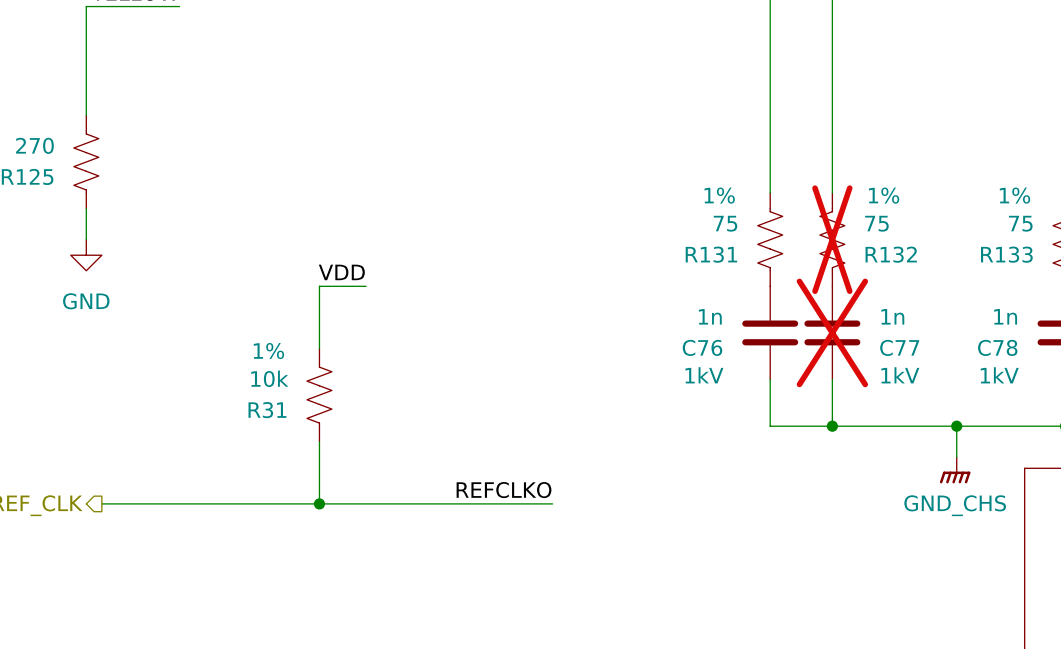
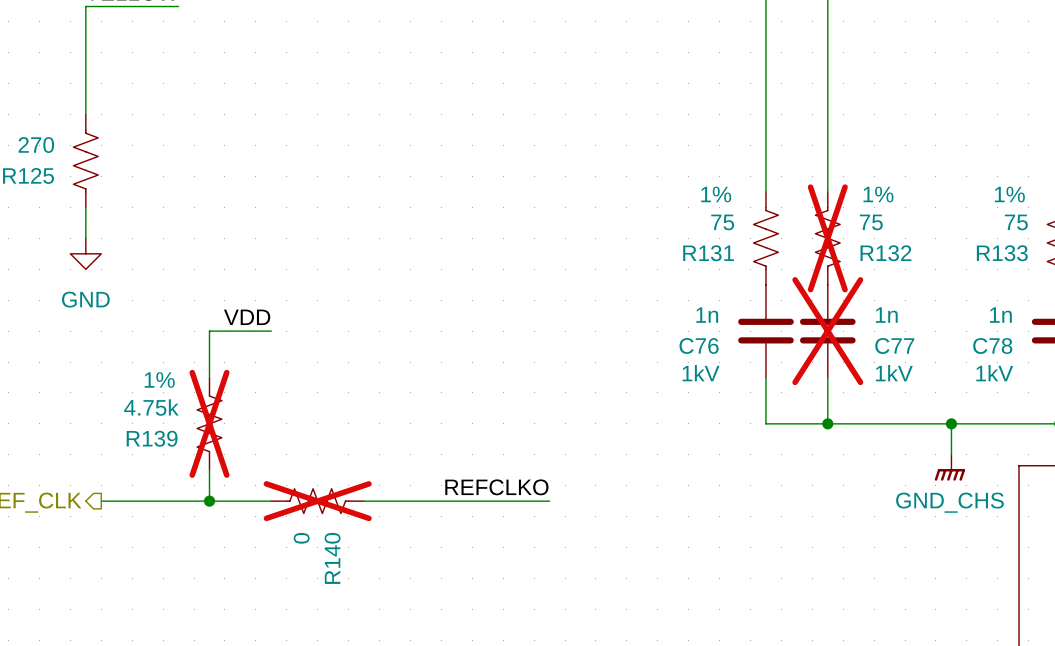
label position: VDD (341, 272) -> VDD (247, 317)
wire: (366, 286) (319, 286) (319, 348) -> none
wire: none -> (271, 331) (209, 331) (209, 377)
R31: 10k (319, 395) -> none
R139: none -> 4.75k (209, 423)
wire: (319, 441) (319, 503) -> none
wire: none -> (209, 470) (209, 501)
junction: none -> (209, 501)
junction: (319, 503) -> none
R140: none -> 0 (317, 501)

